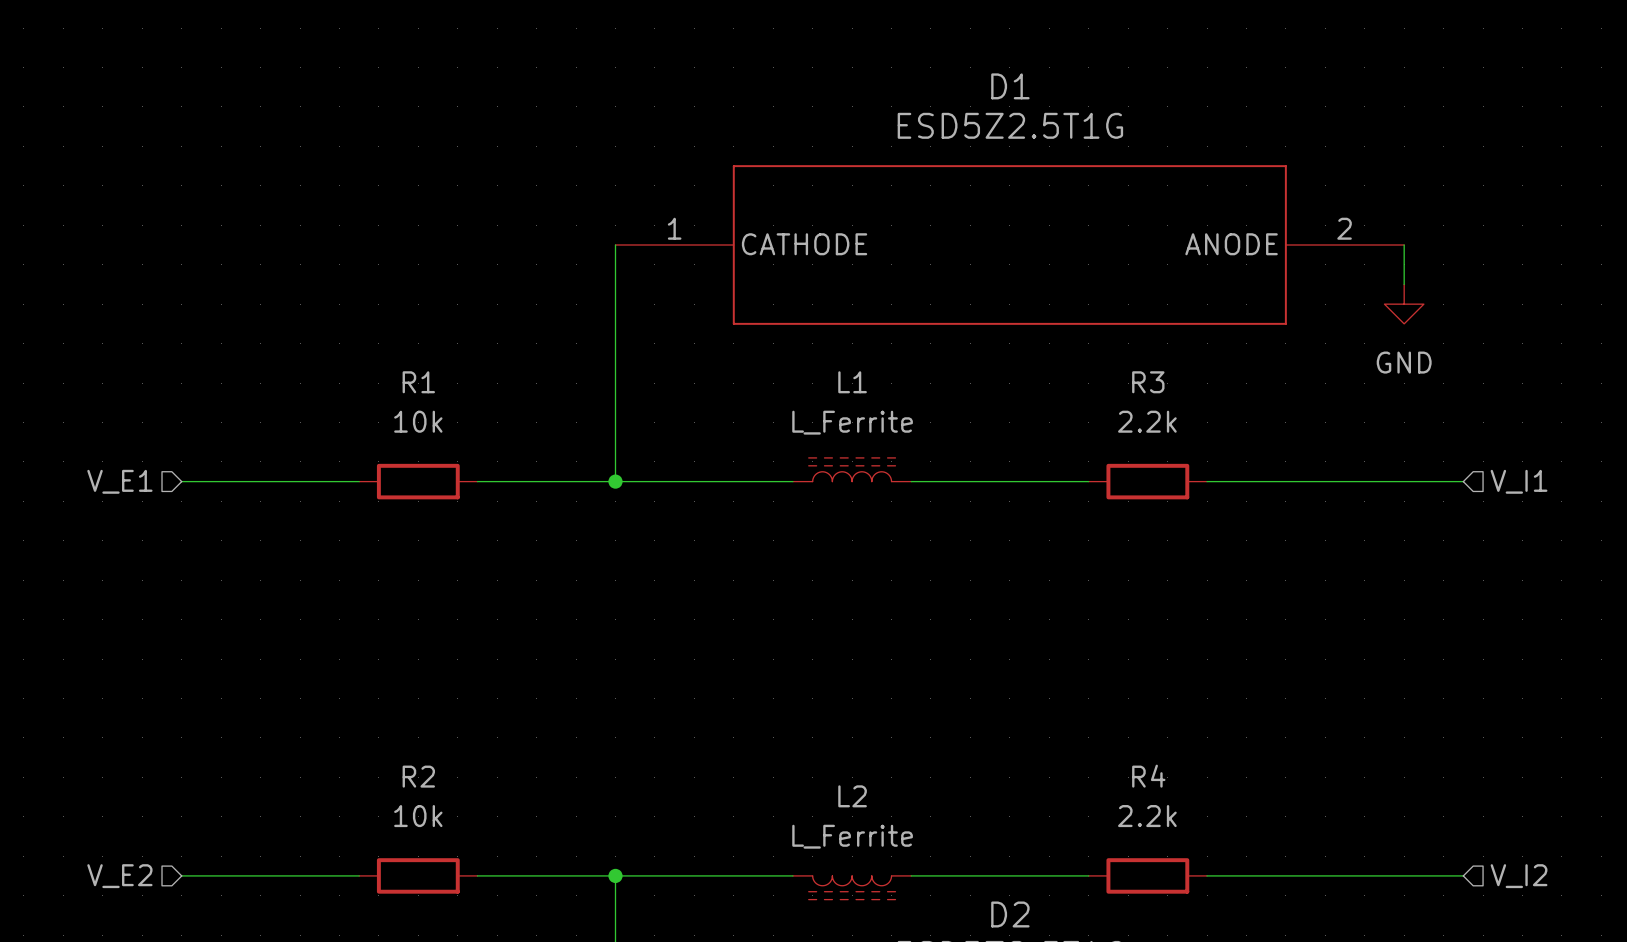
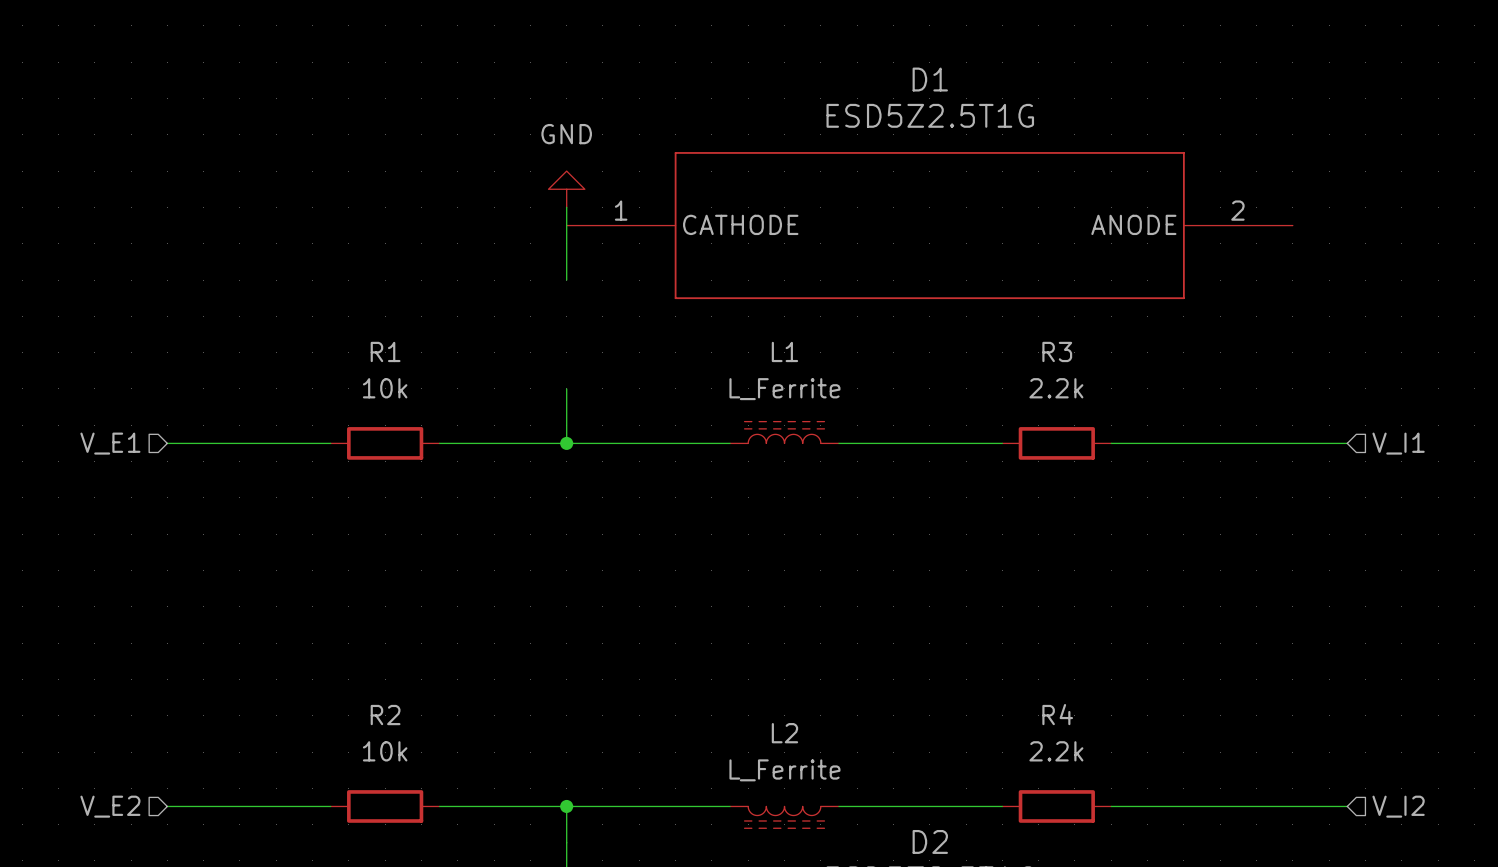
power symbol: none -> GND (566, 189)
wire: none -> (566, 207) (566, 225)
wire: (1404, 245) (1404, 284) -> none
wire: (615, 304) (615, 422) -> none
power symbol: GND (1404, 304) -> none

